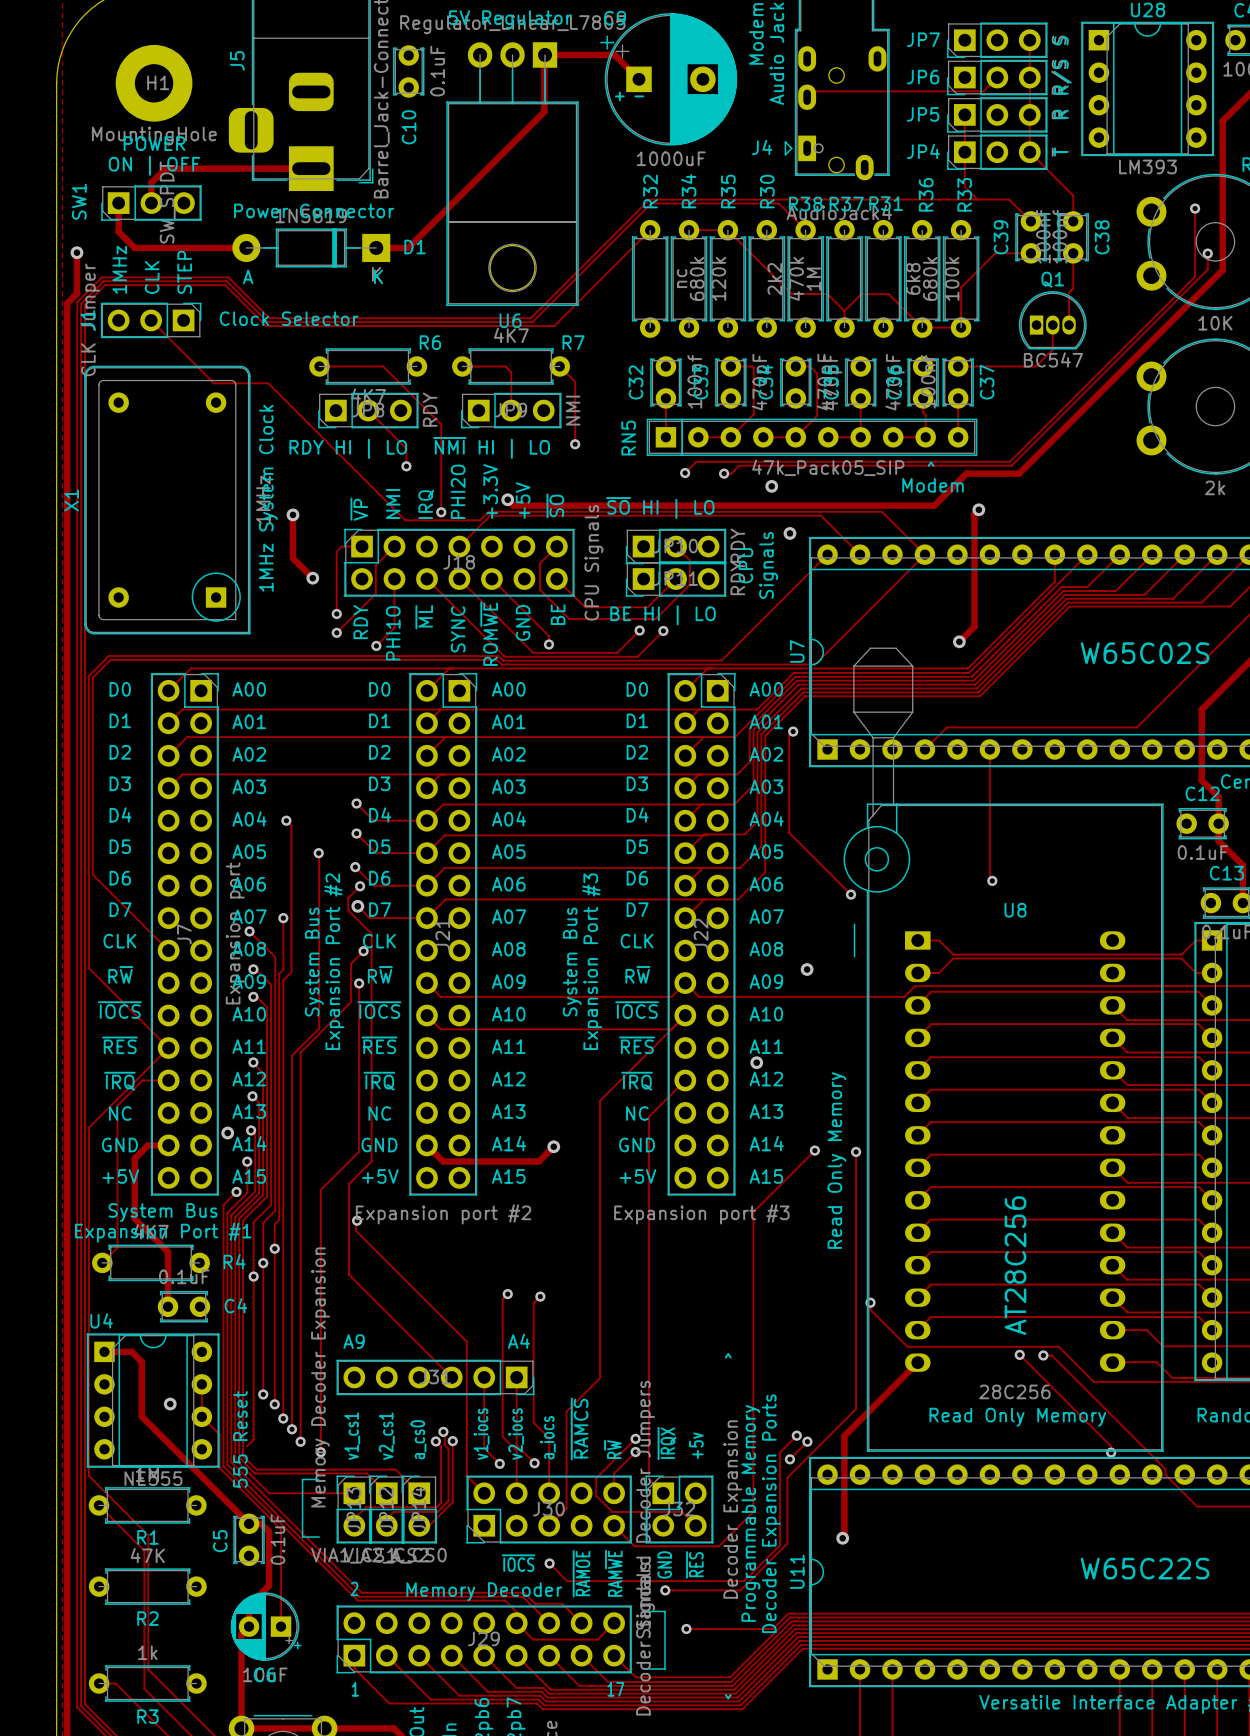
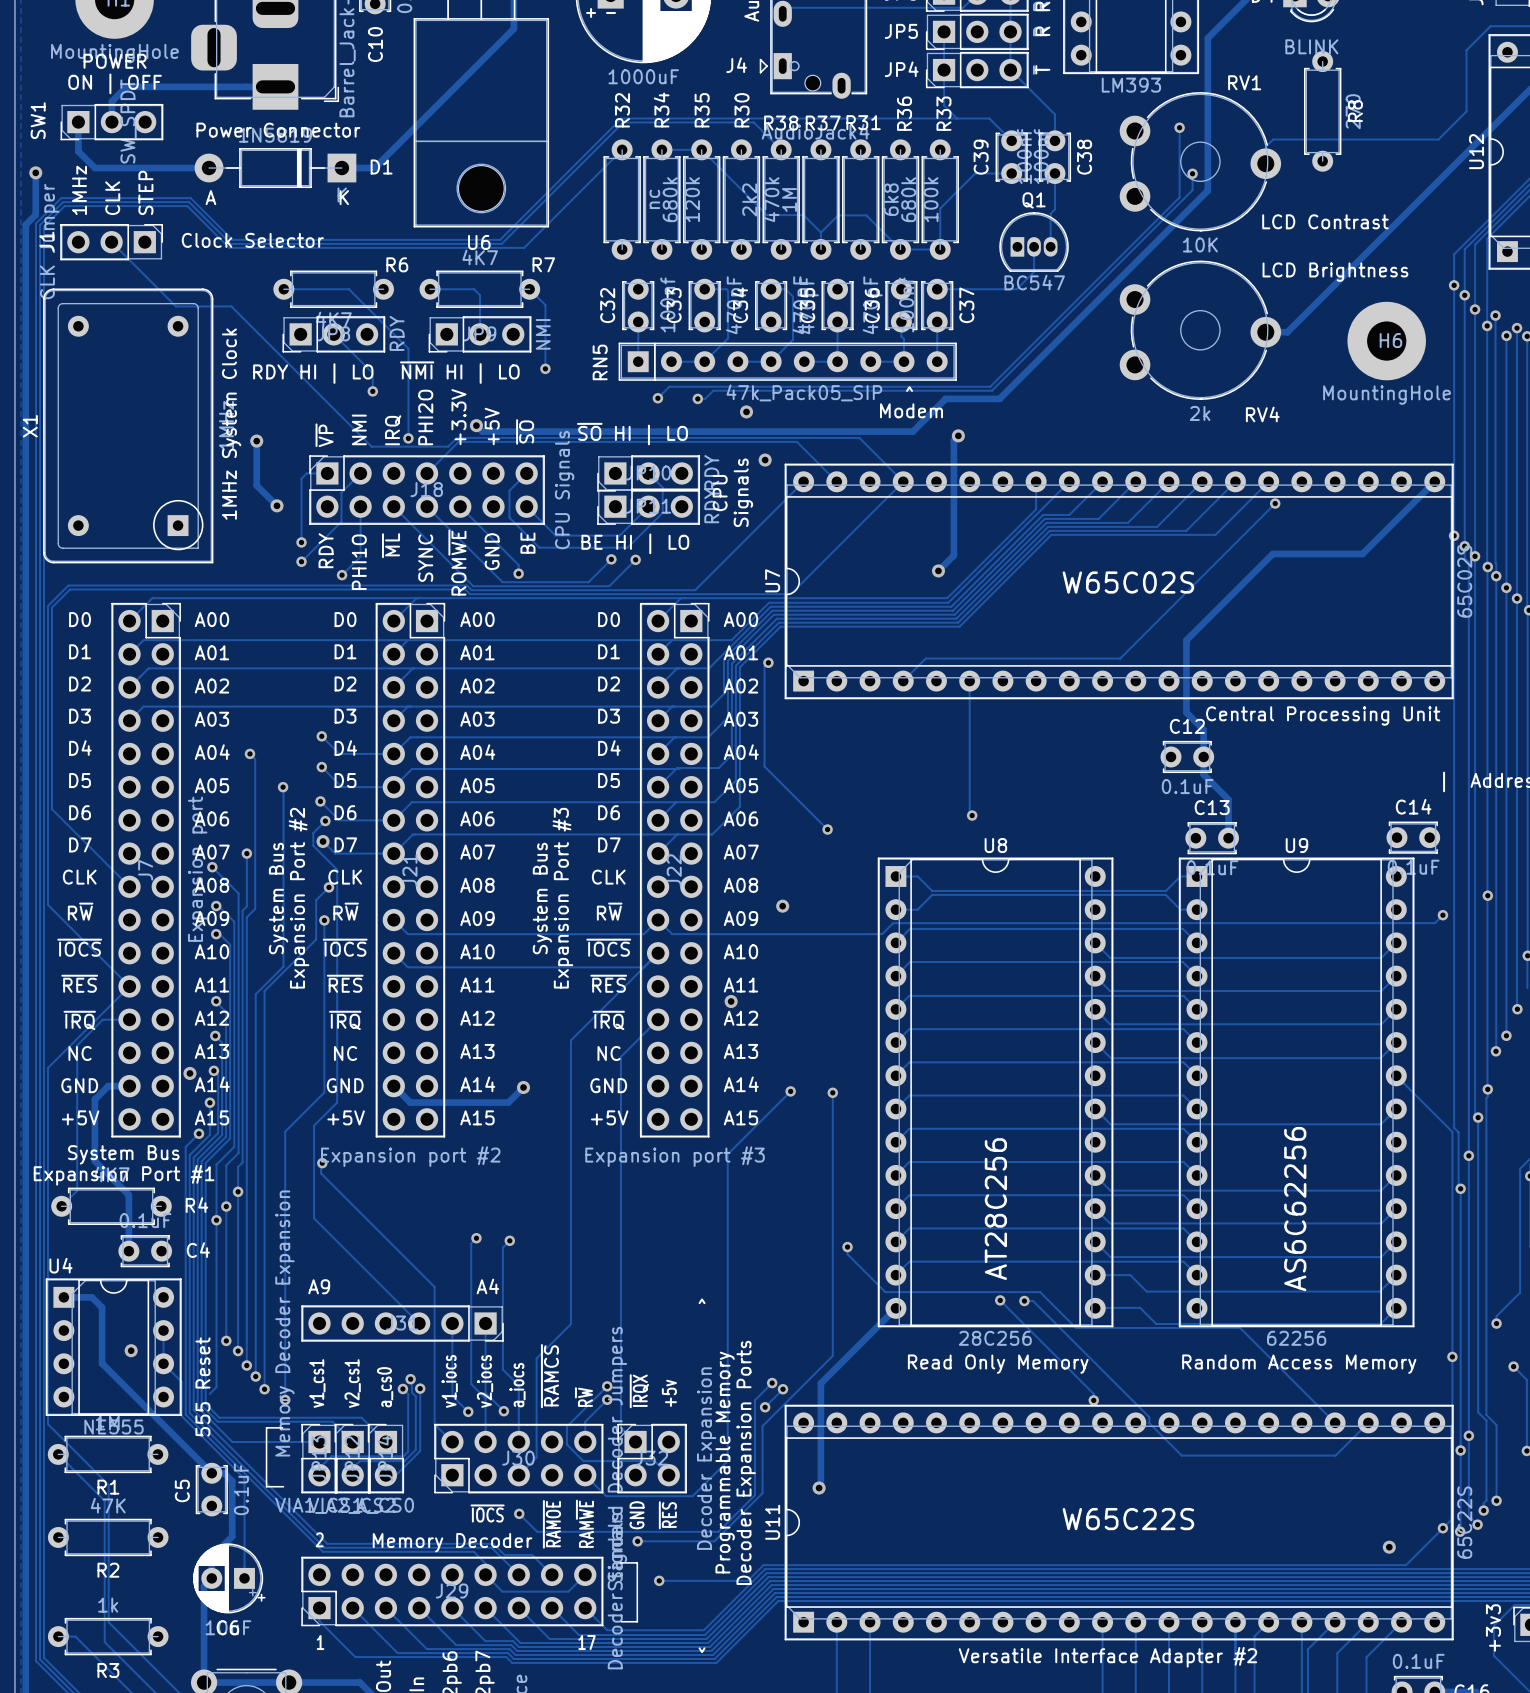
U8 footprint: [843, 647, 1164, 1452] -> [877, 857, 1114, 1328]
text: Read Only Memory (837, 1160) -> none

